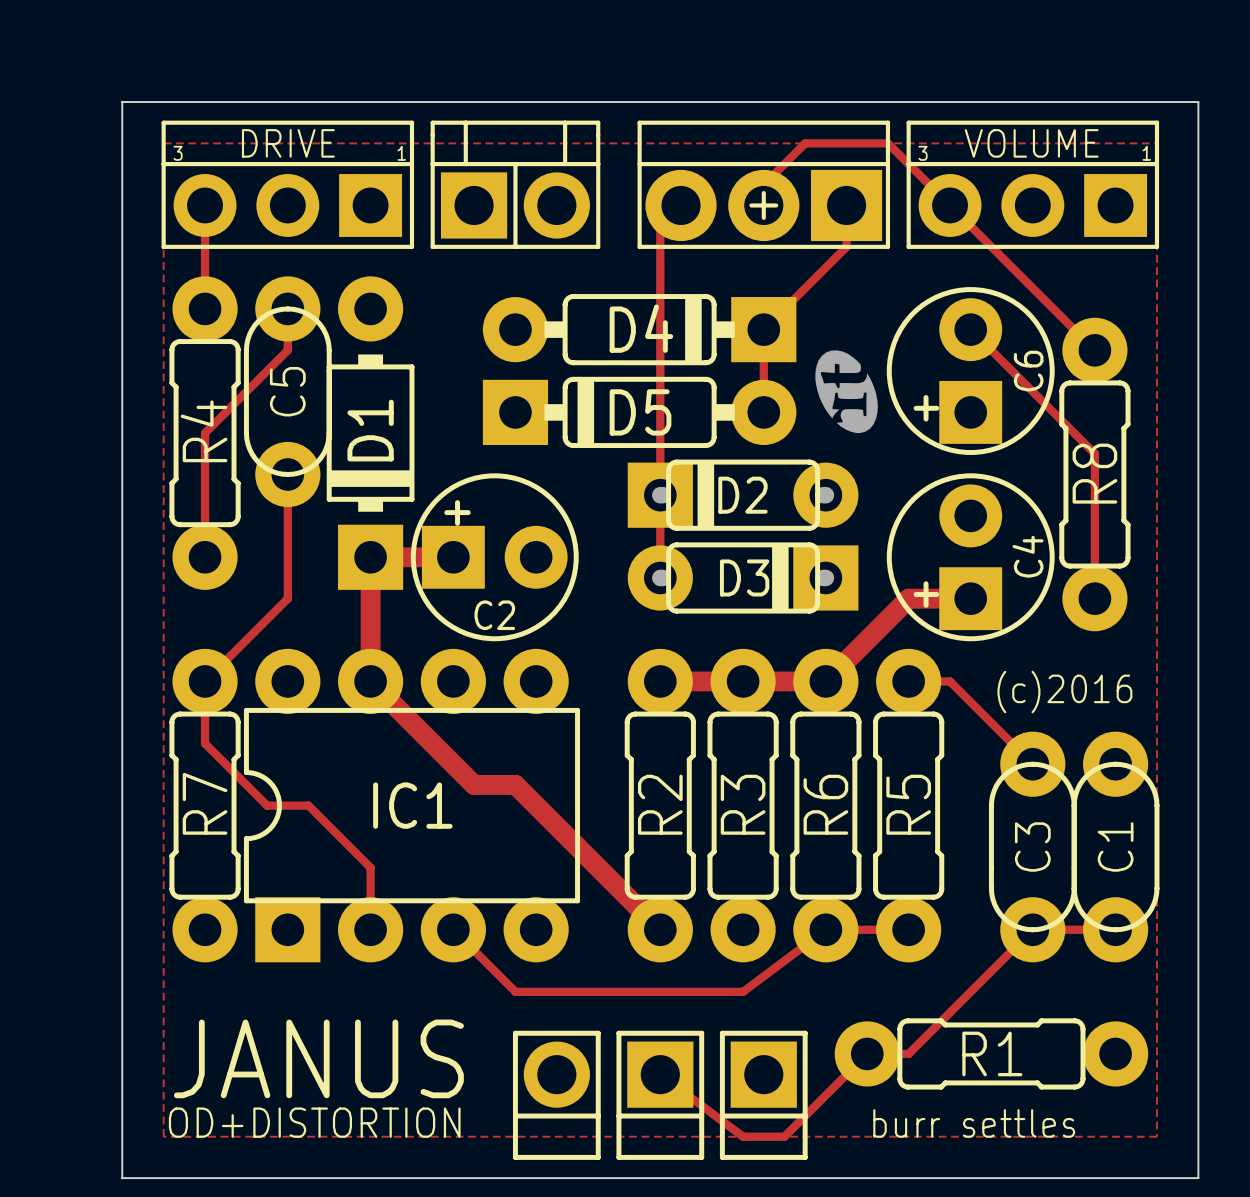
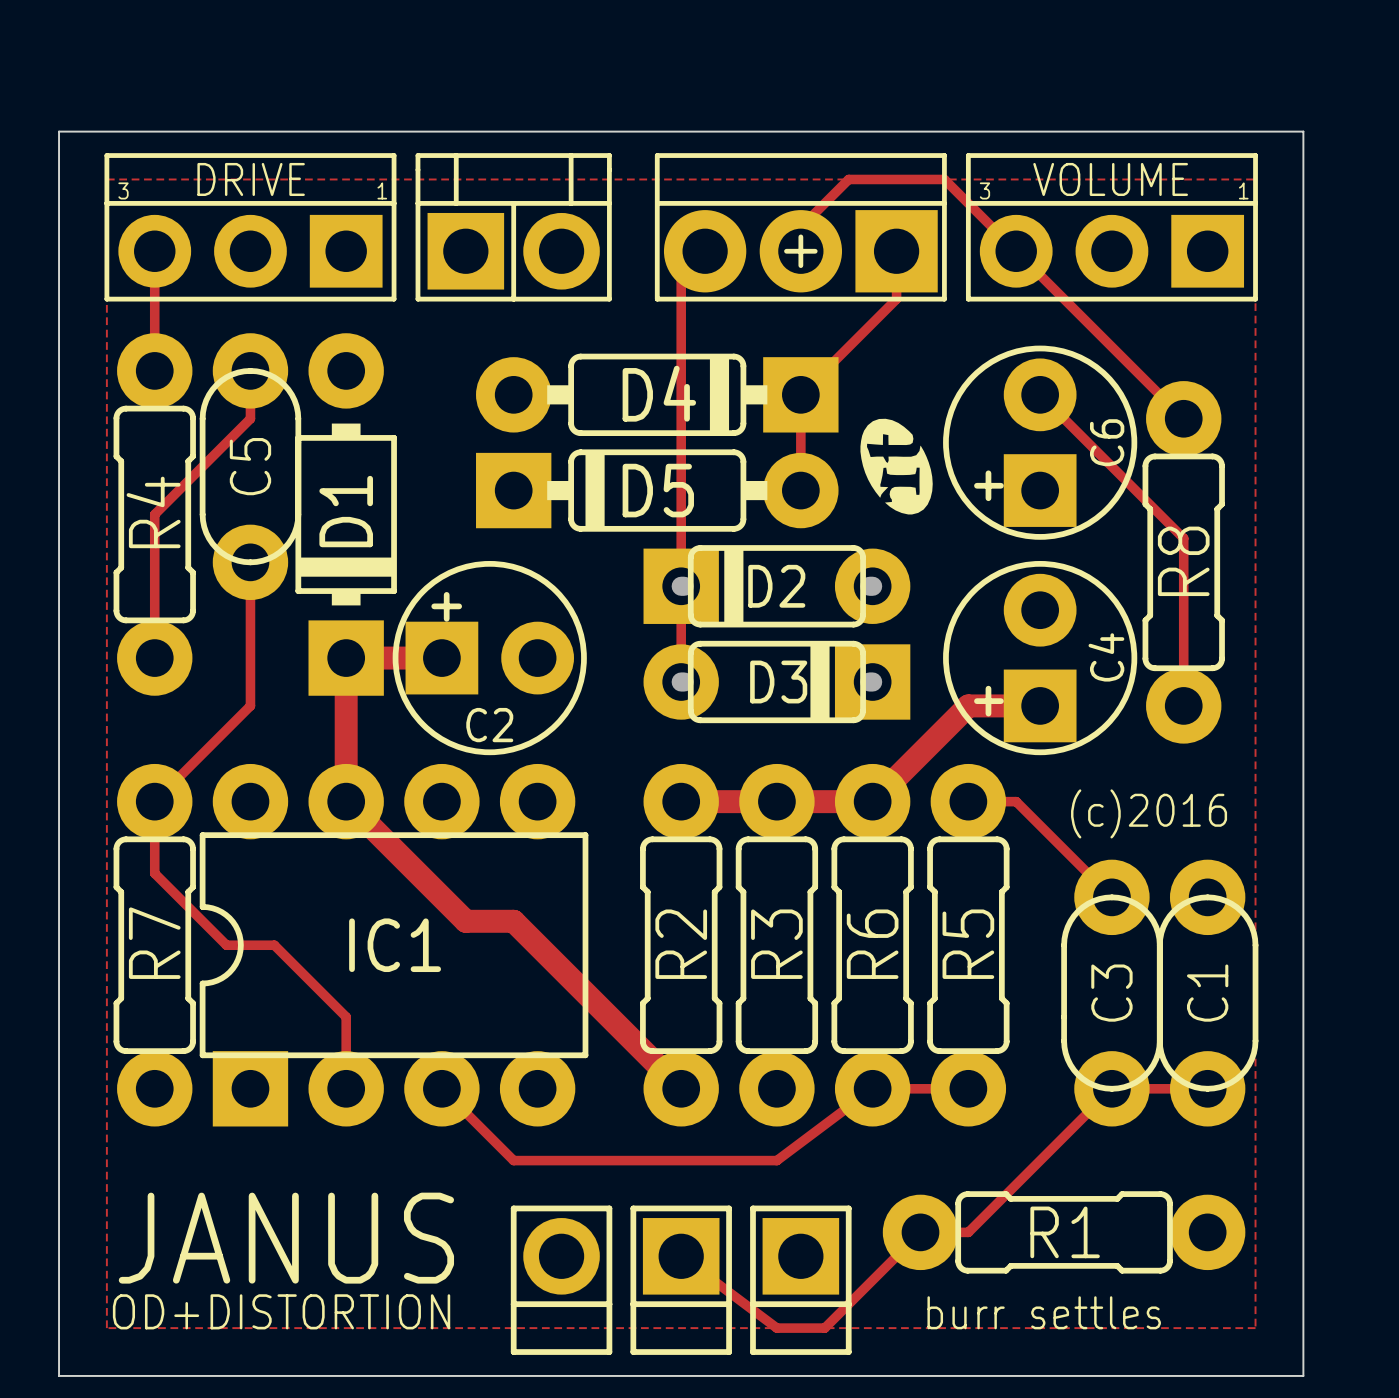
drawing shape: [815, 350, 878, 434] -> [860, 418, 933, 515]

